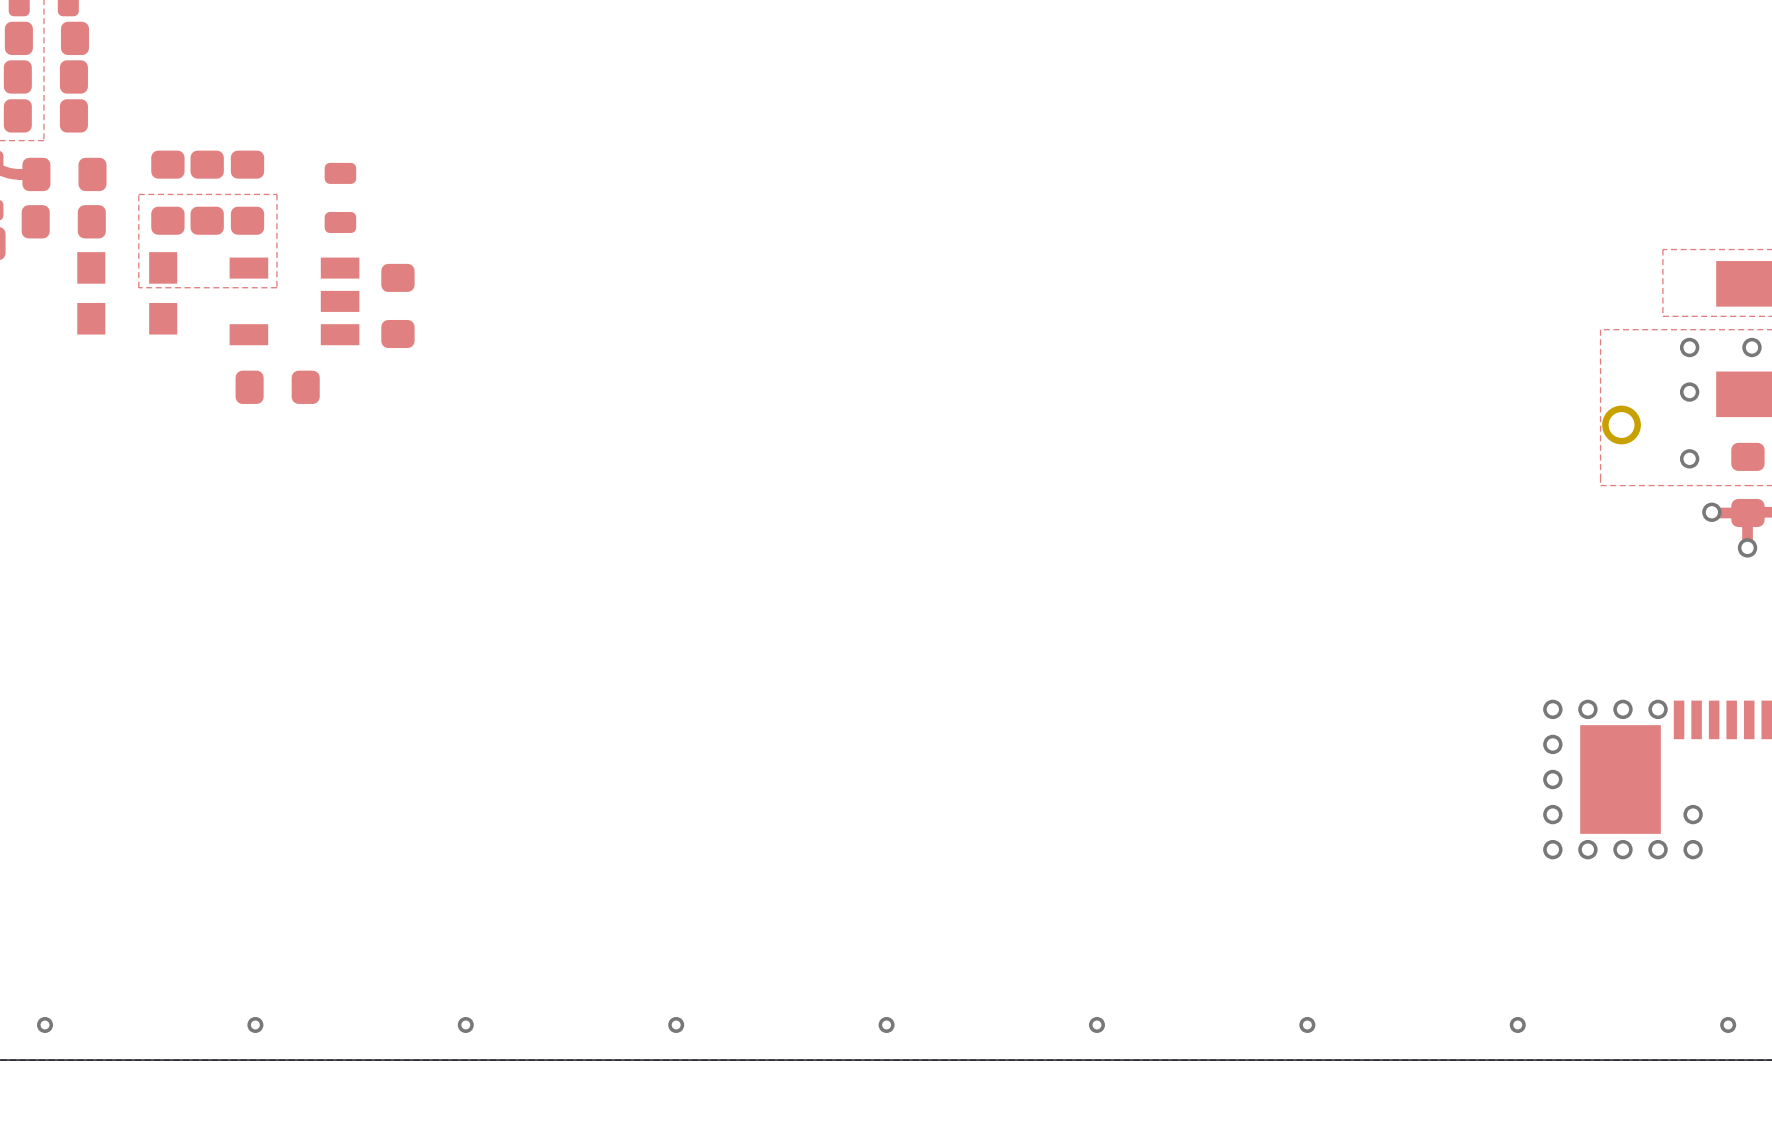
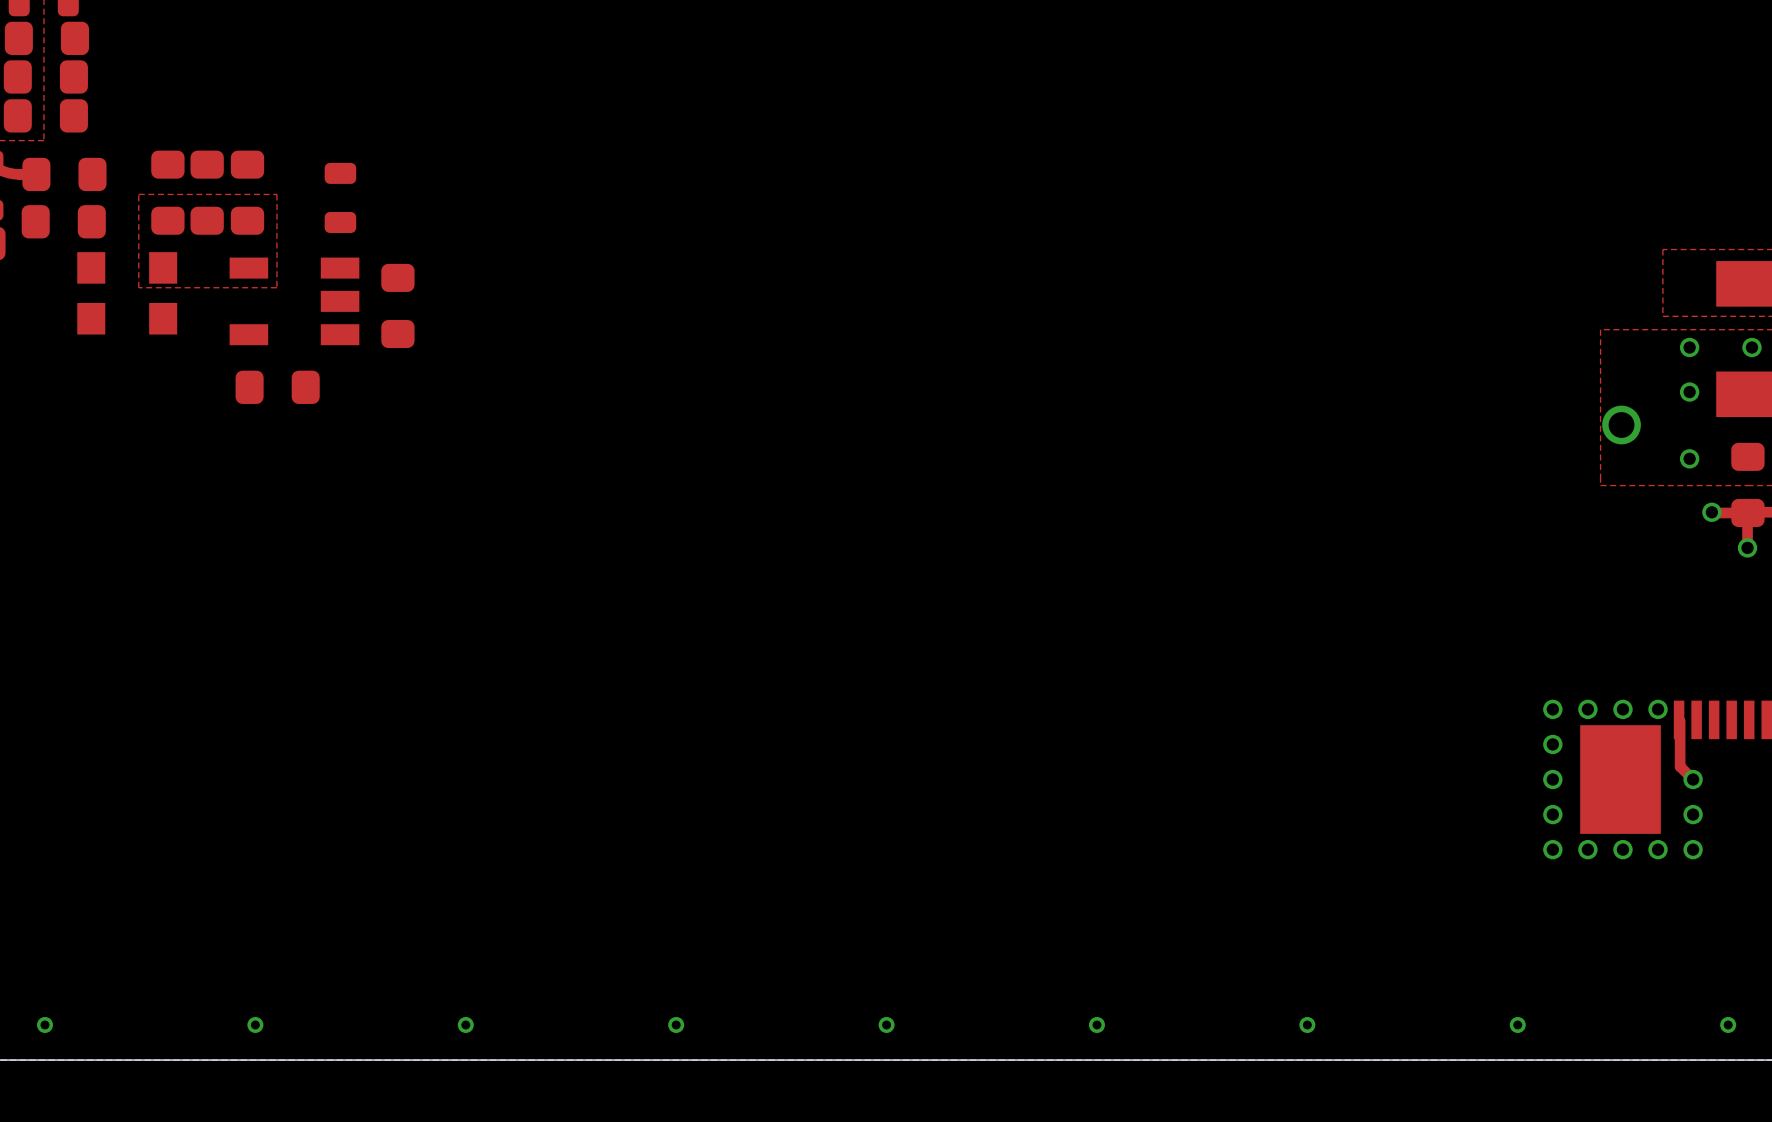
top track: none -> (1680, 720) (1680, 766) (1693, 779)
via: none -> (1693, 779)

